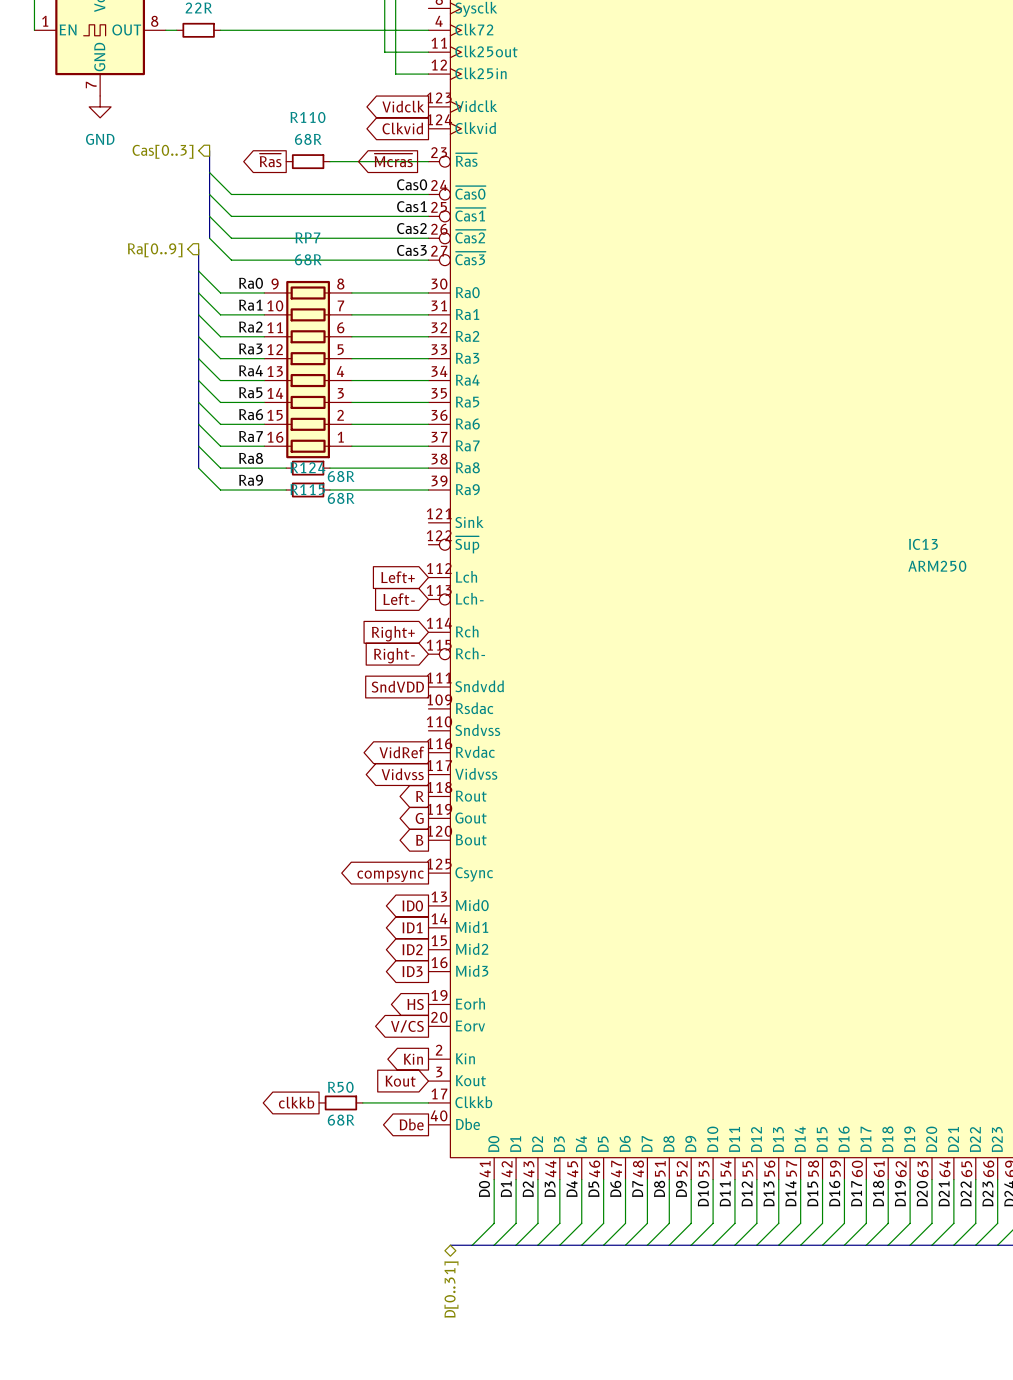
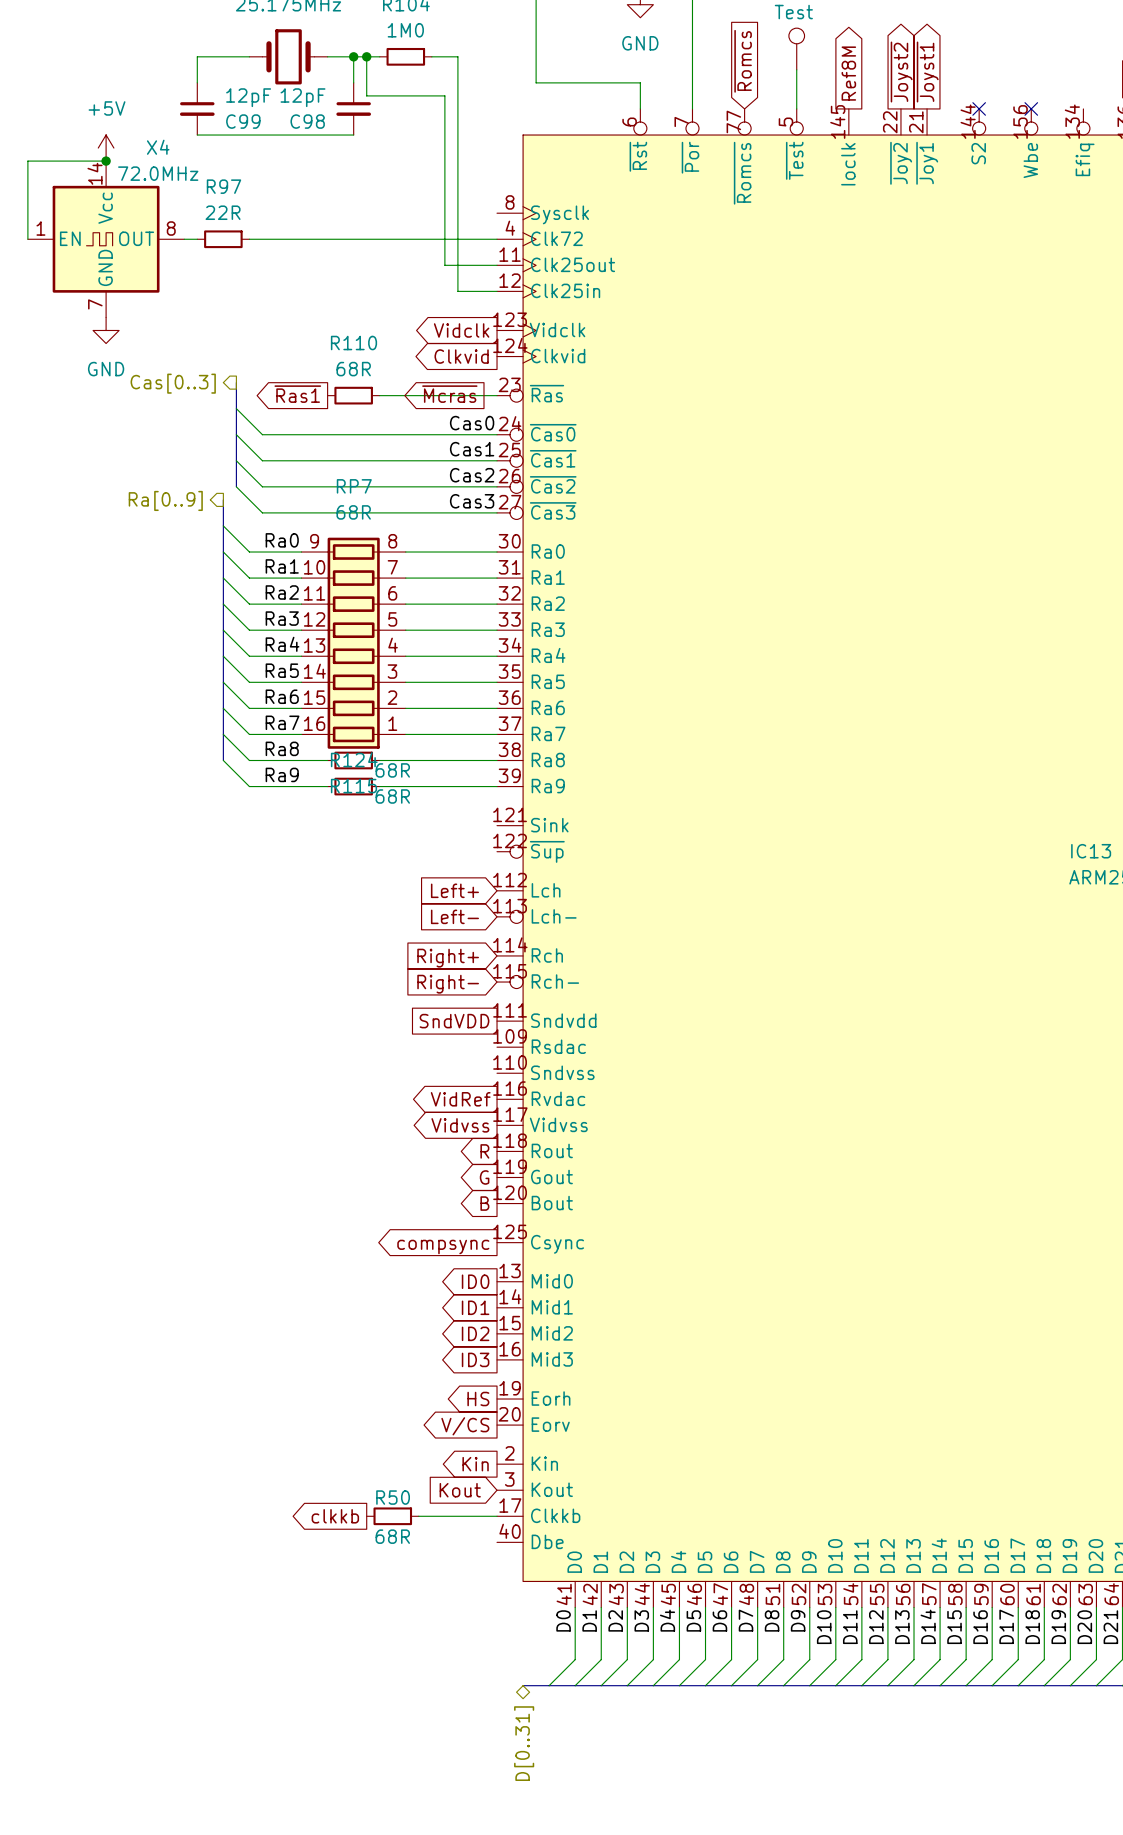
global label: ~{Ras} (270, 160) -> ~{Ras1} (297, 394)
global label: Dbe (411, 1124) -> none

